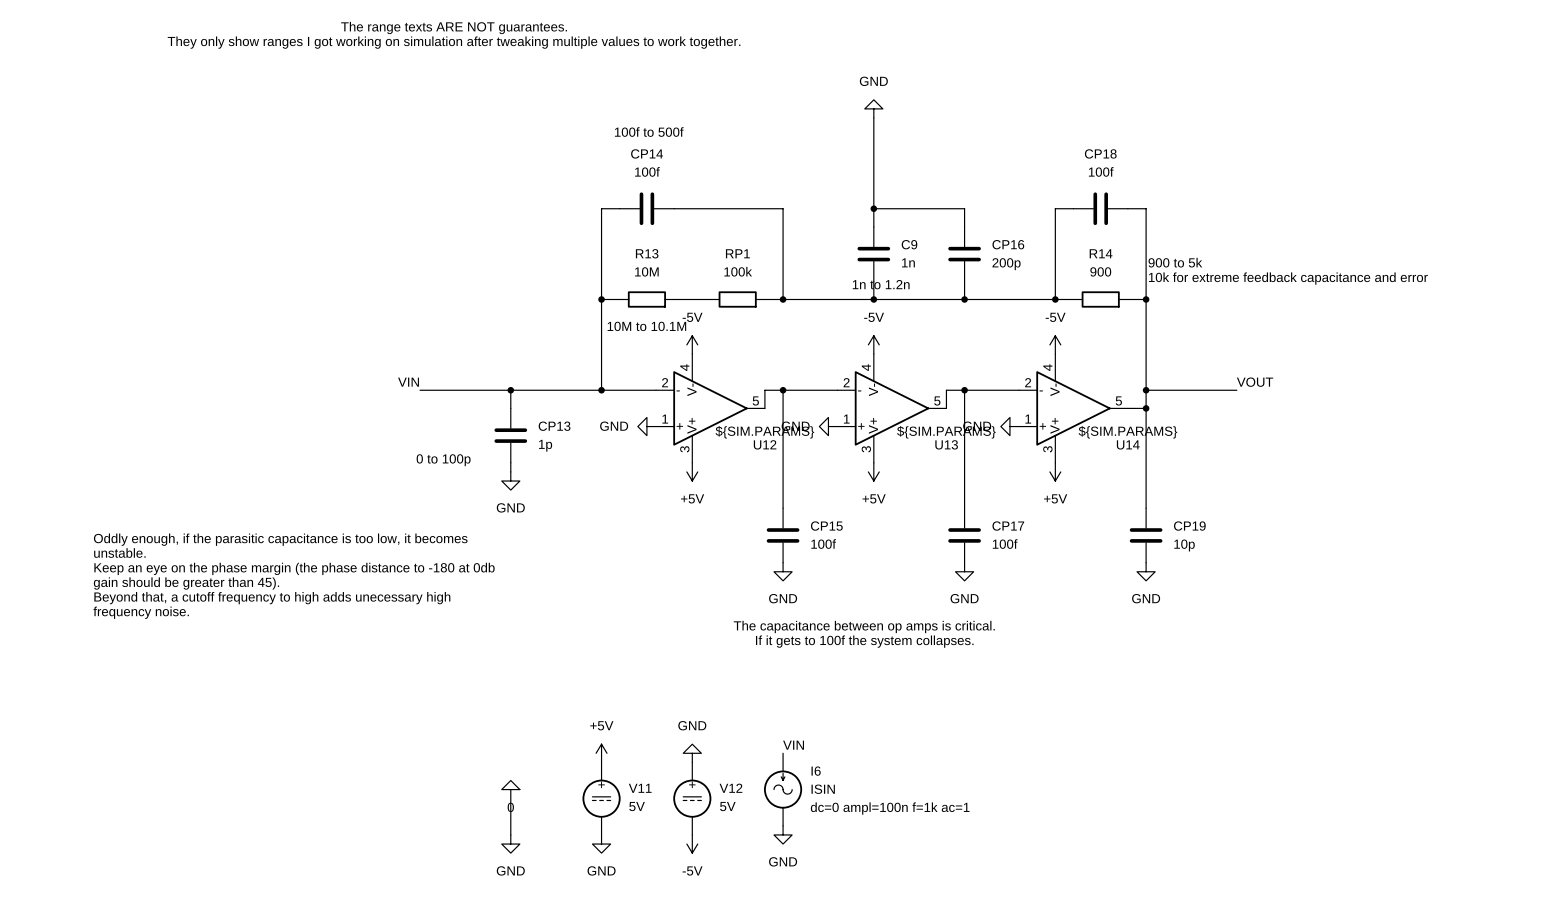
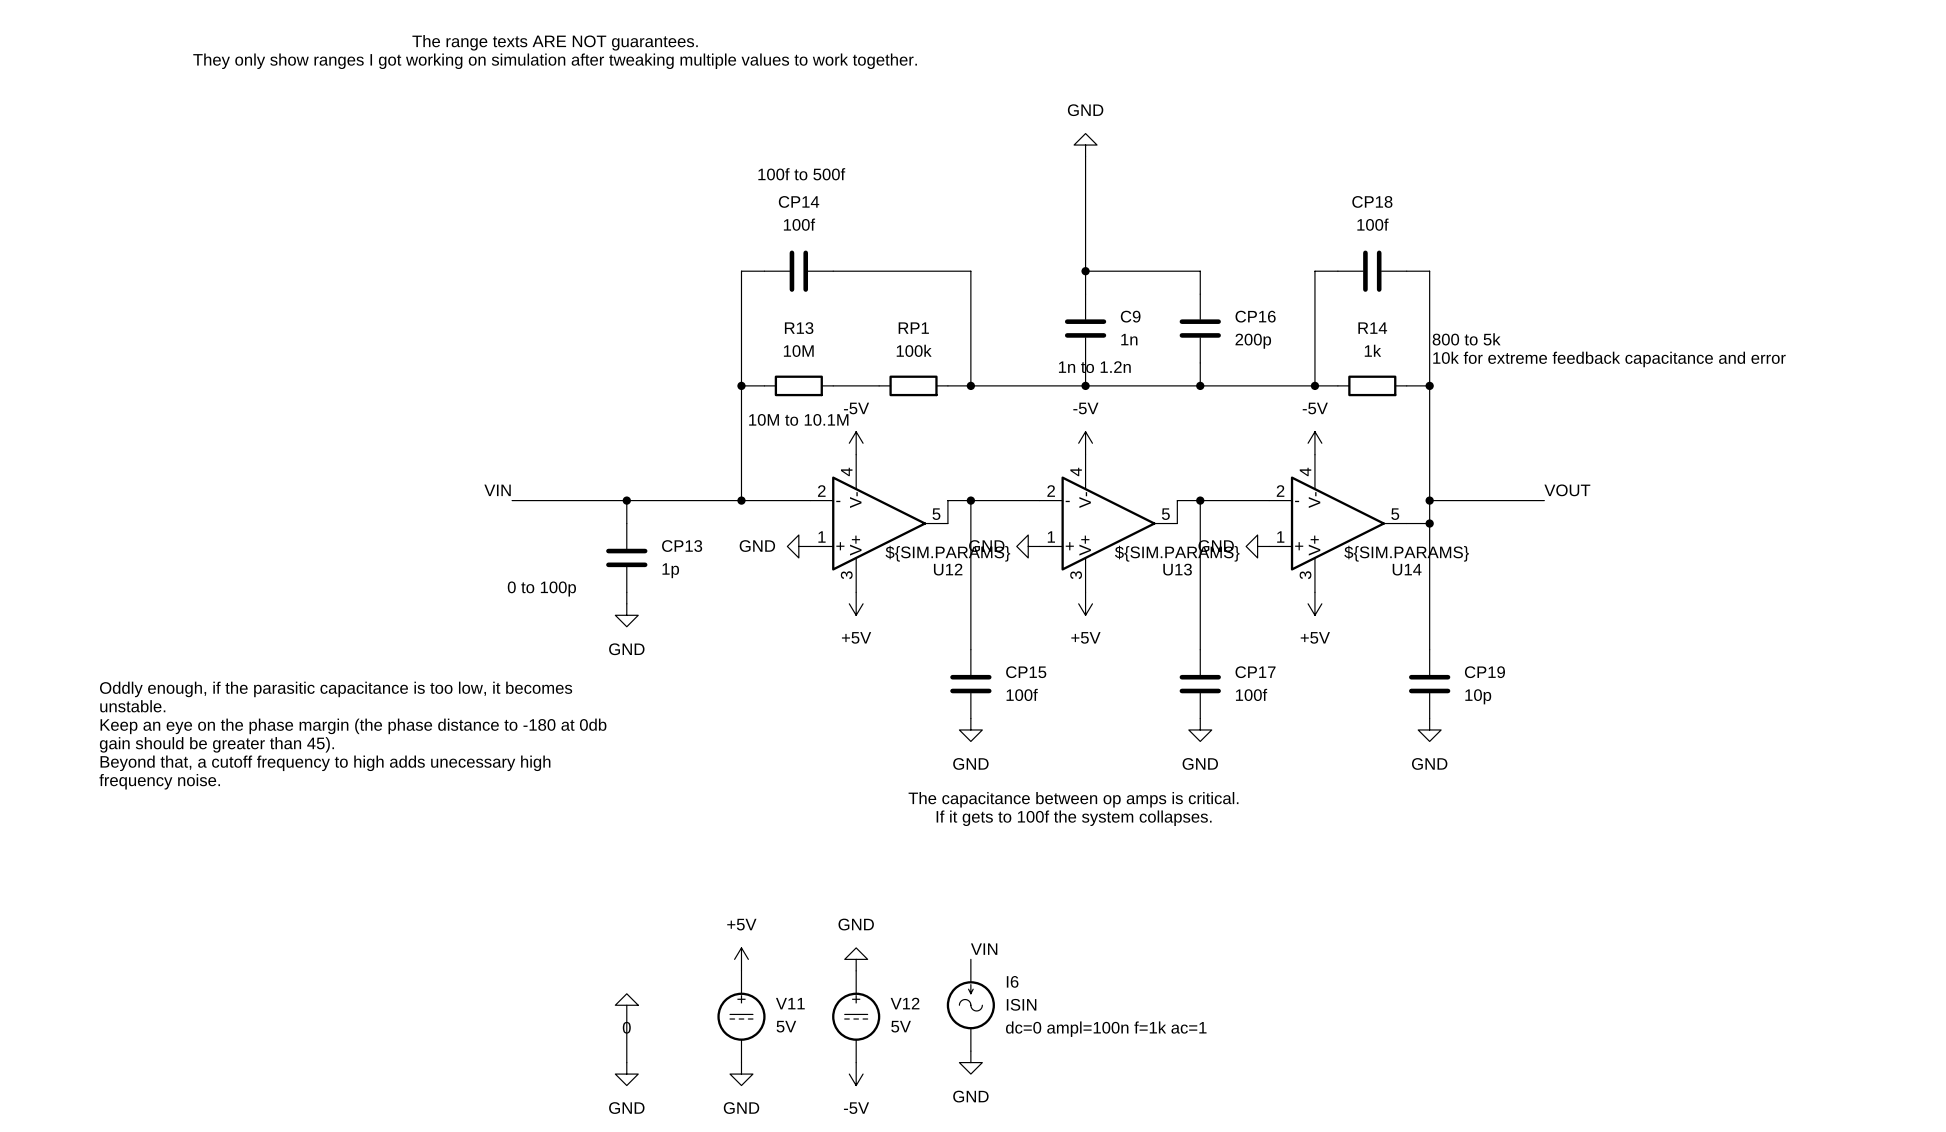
text: 900 to 5k (1175, 262) -> 800 to 5k (1466, 339)
R14 value: 900 (1100, 271) -> 1k (1372, 350)

